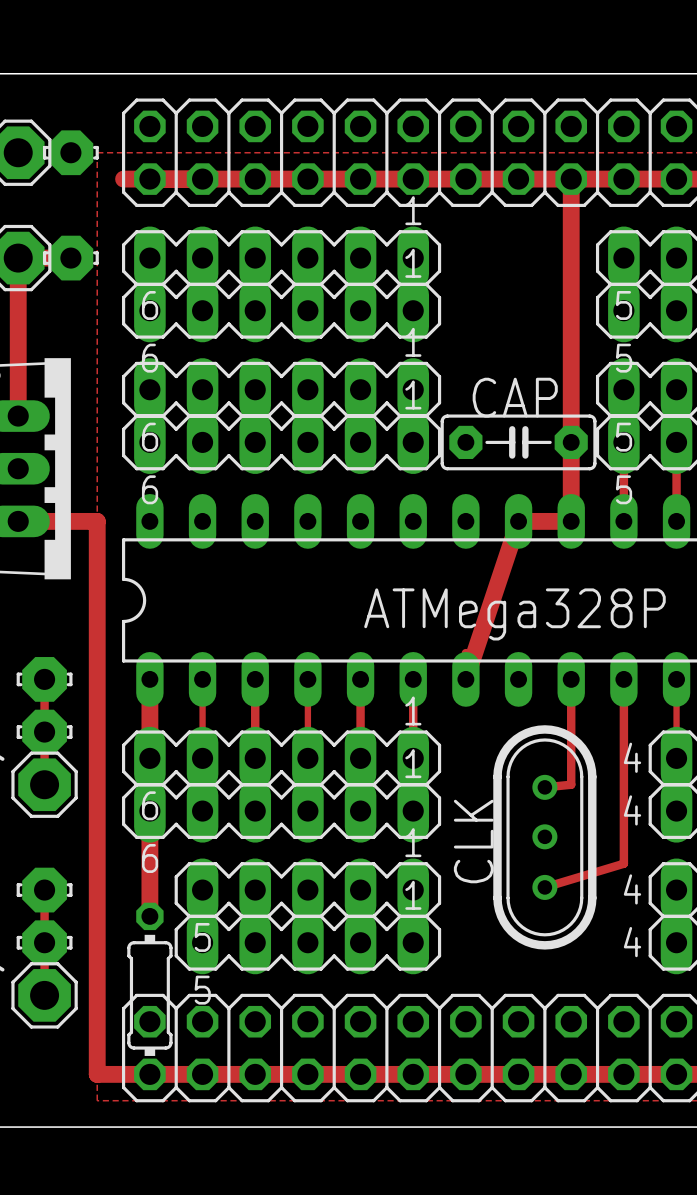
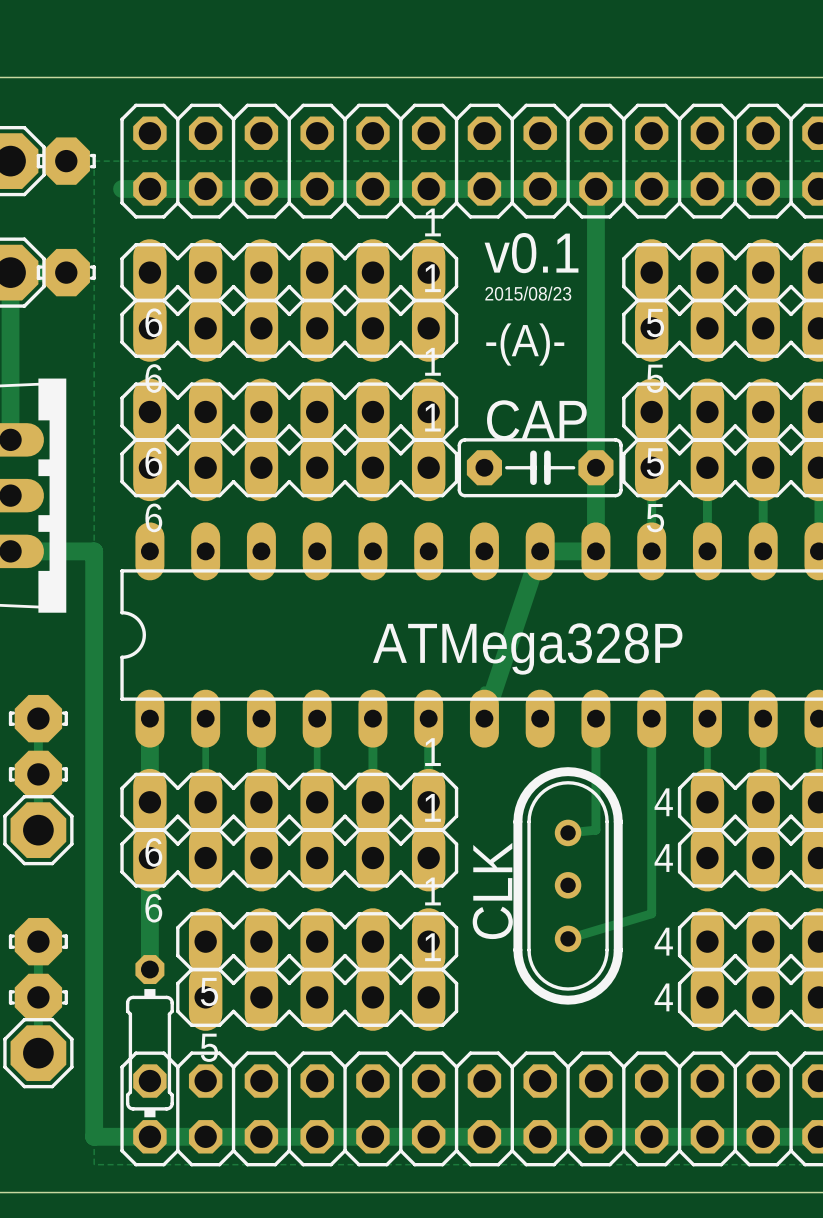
text: none -> v0.1 (531, 253)
text: none -> 2015/08/23 (528, 293)
text: none -> -(A)- (525, 344)

